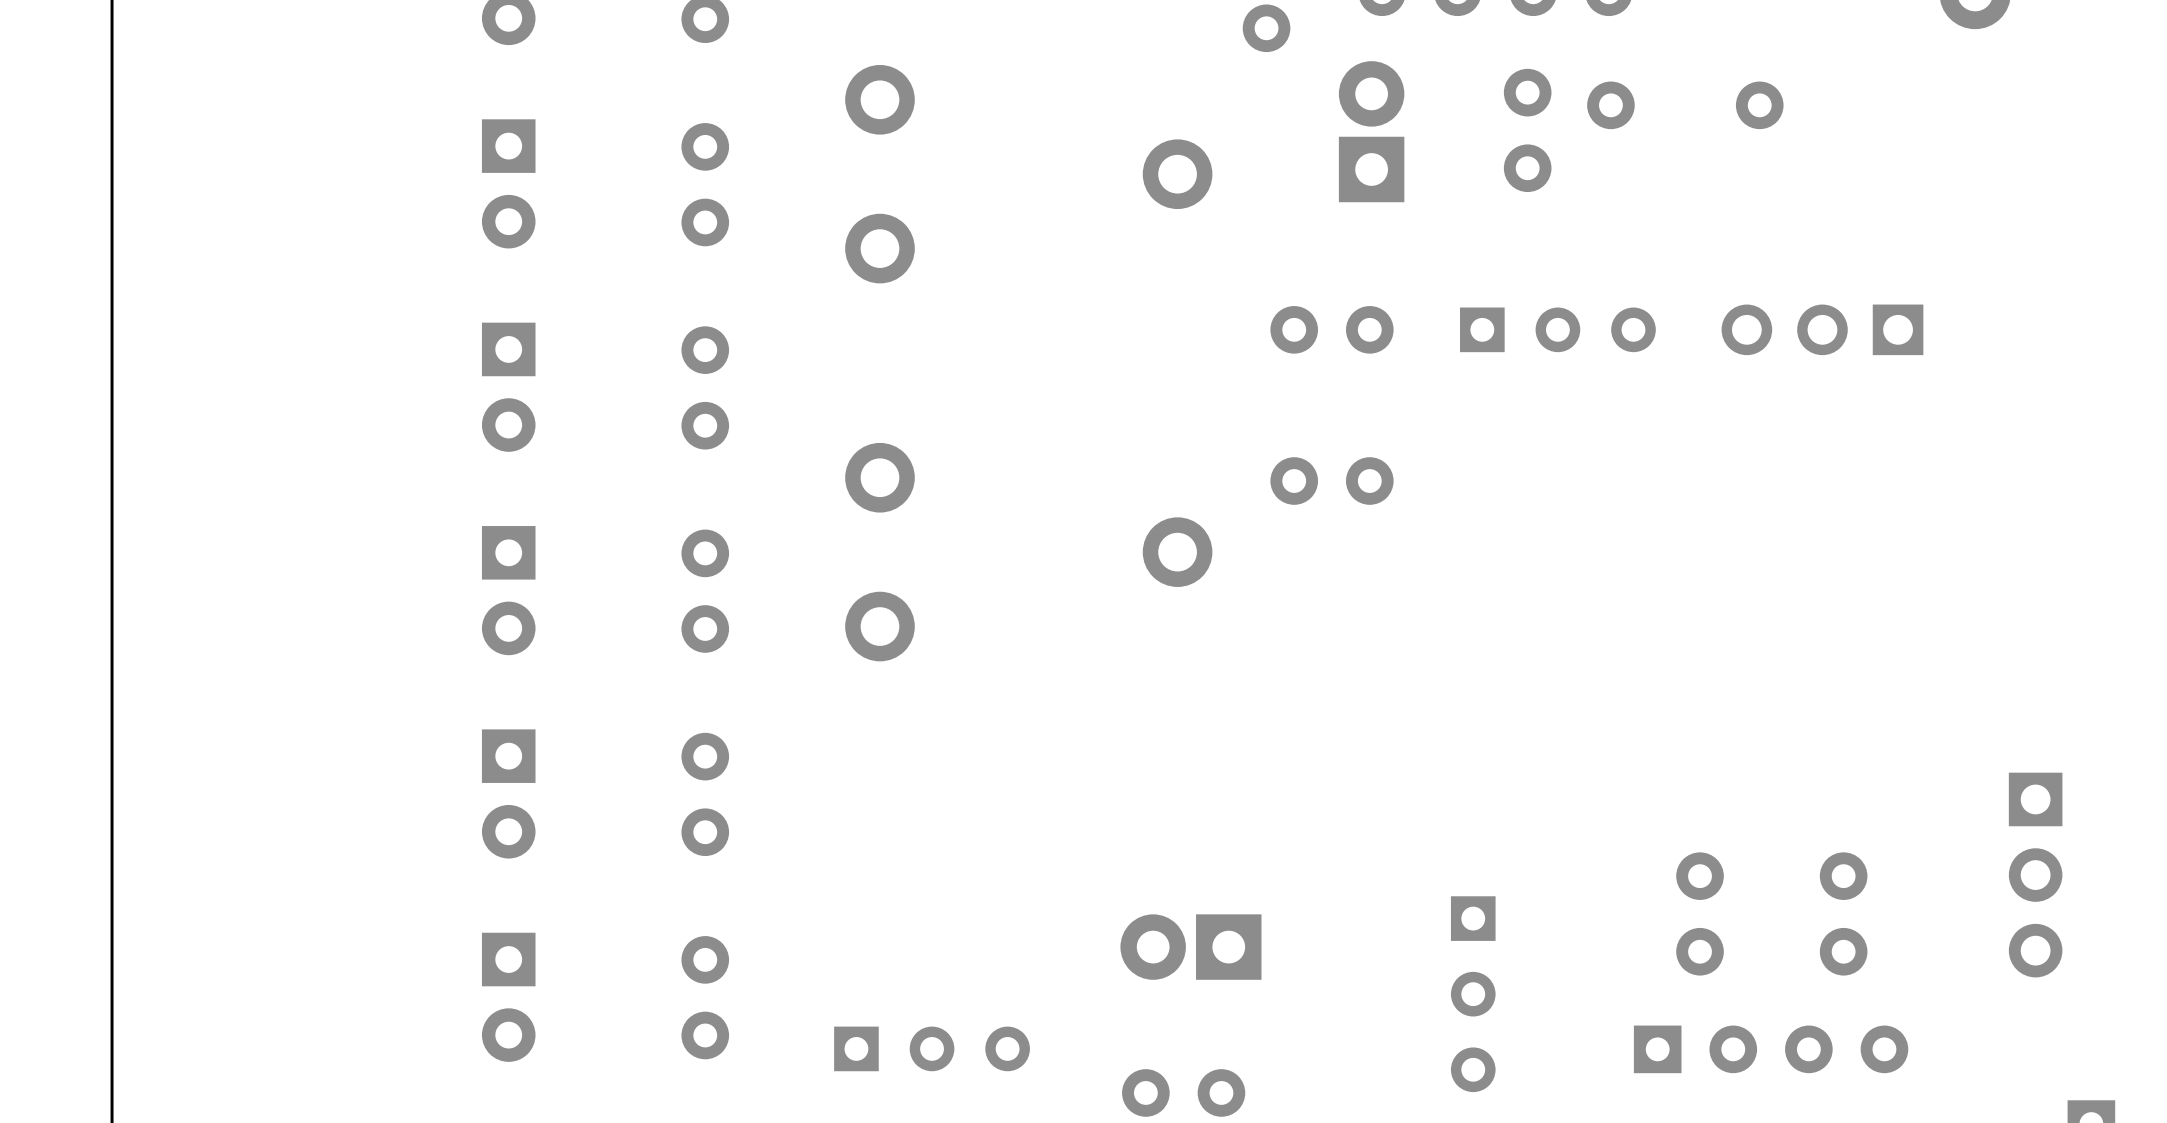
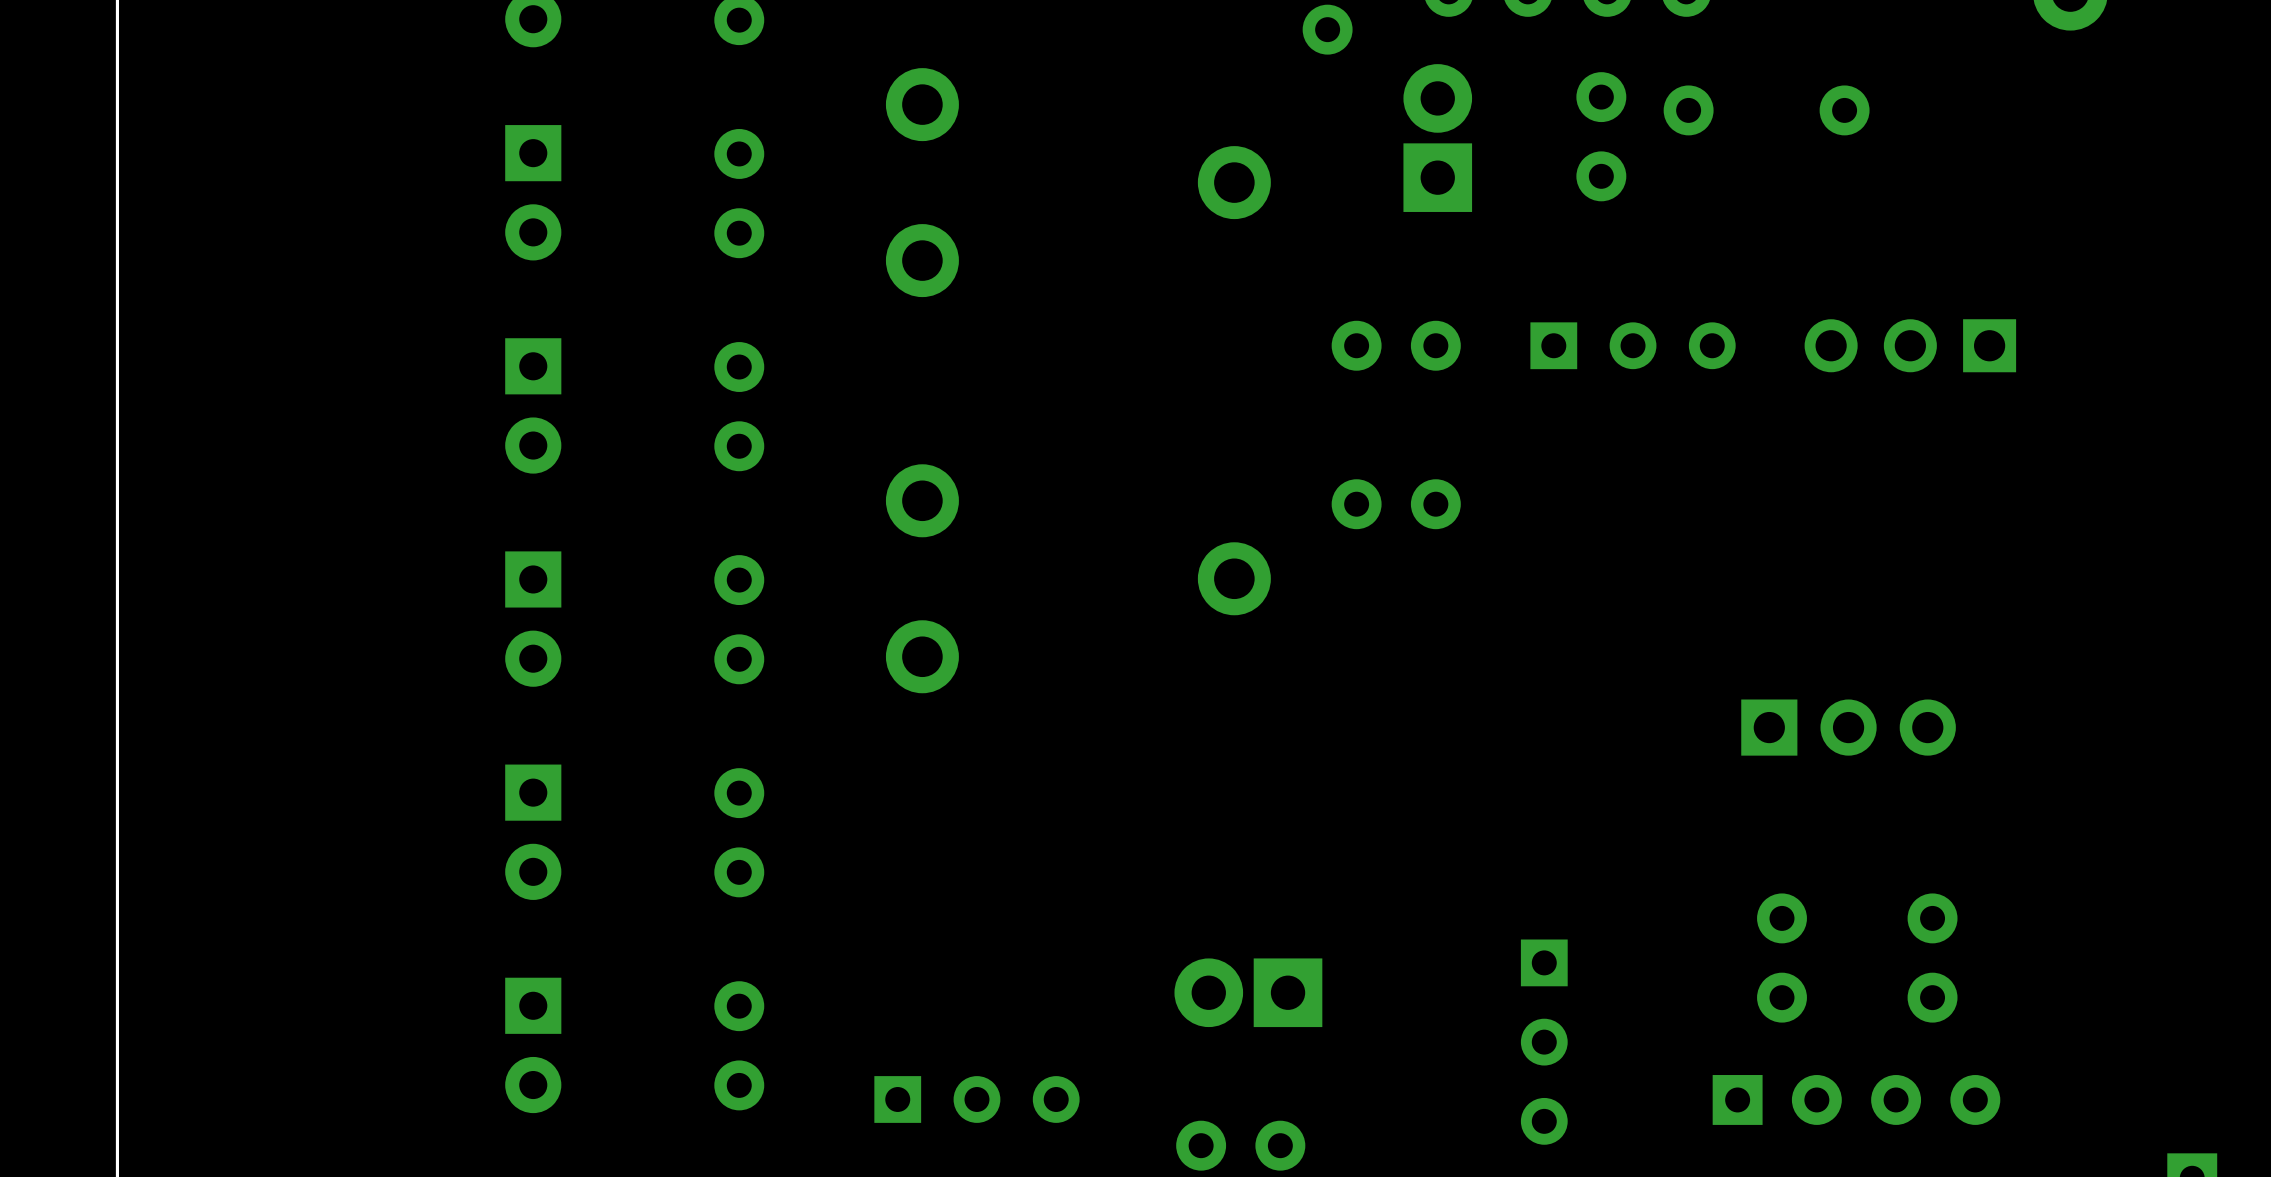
part rotation: 0° (2035, 875) -> 90° counterclockwise (1848, 727)
part position: (2035, 875) -> (1848, 727)

